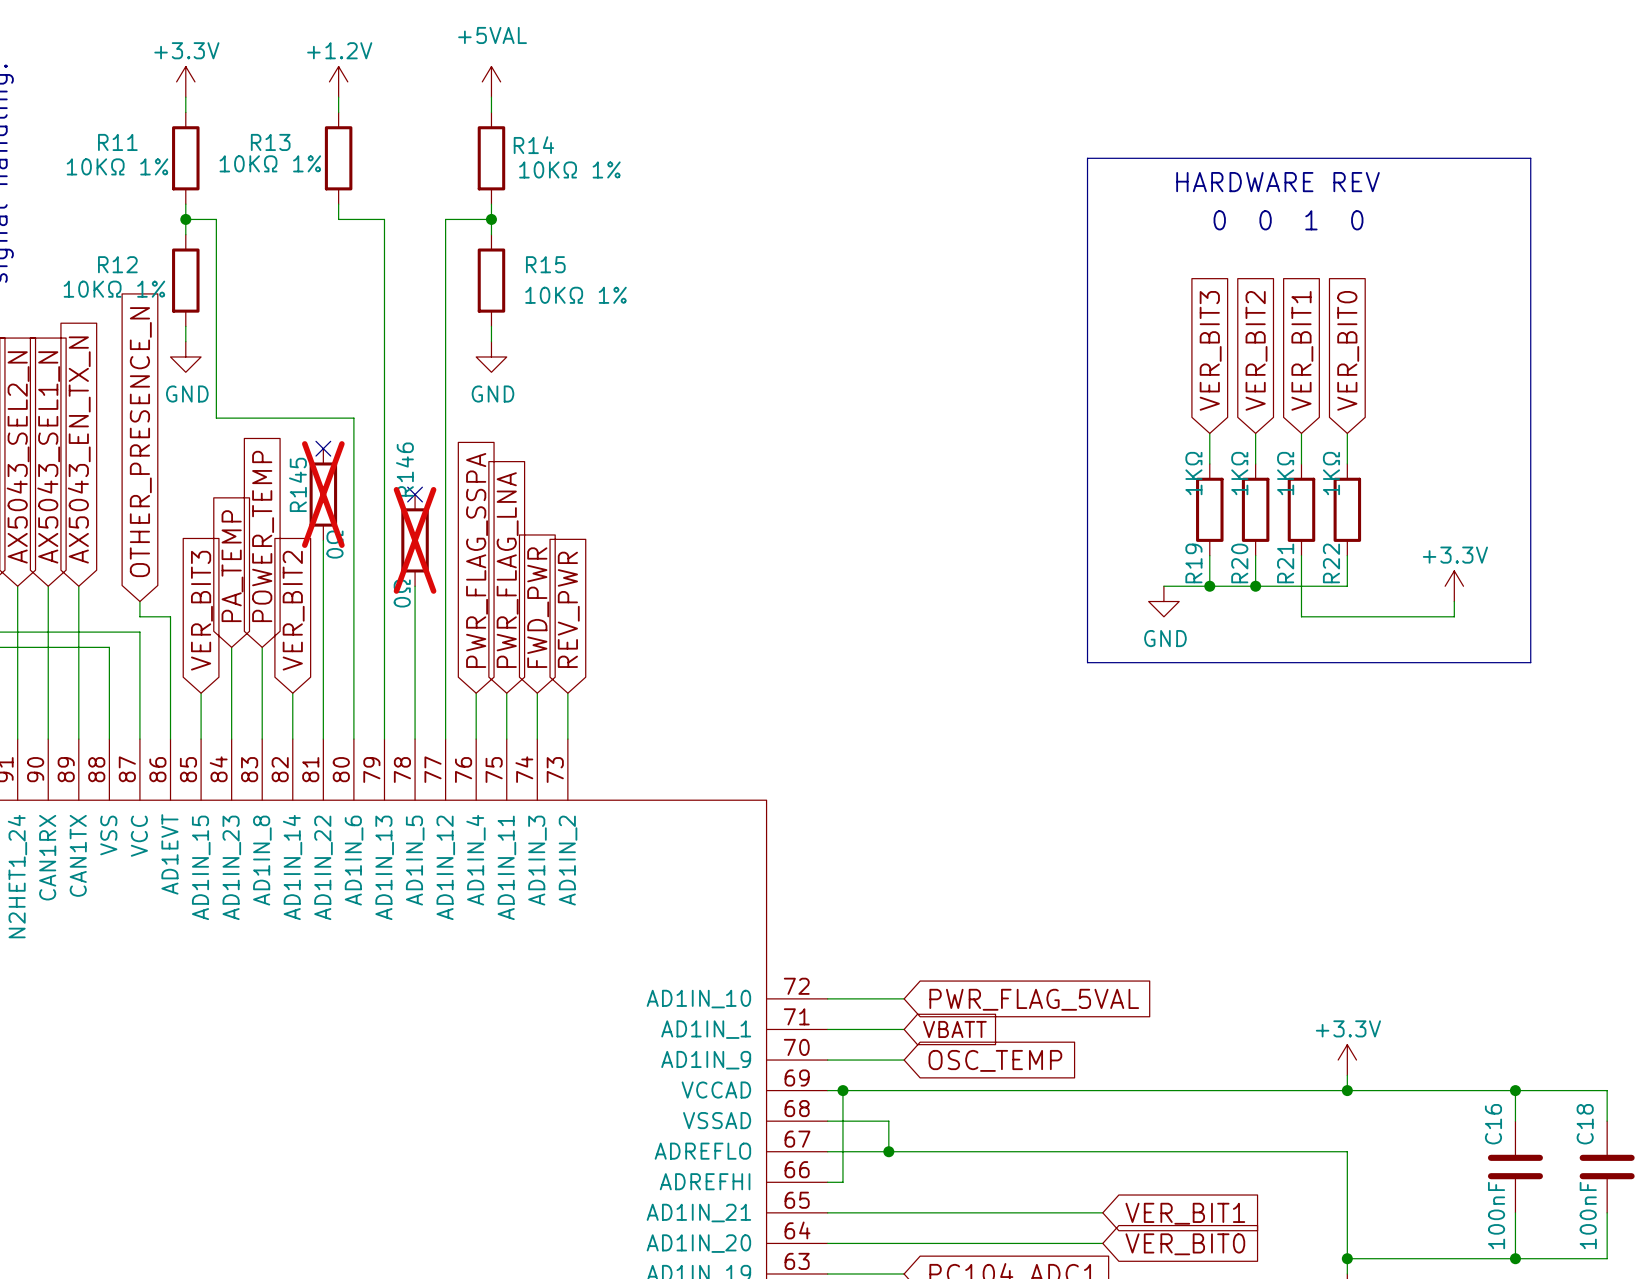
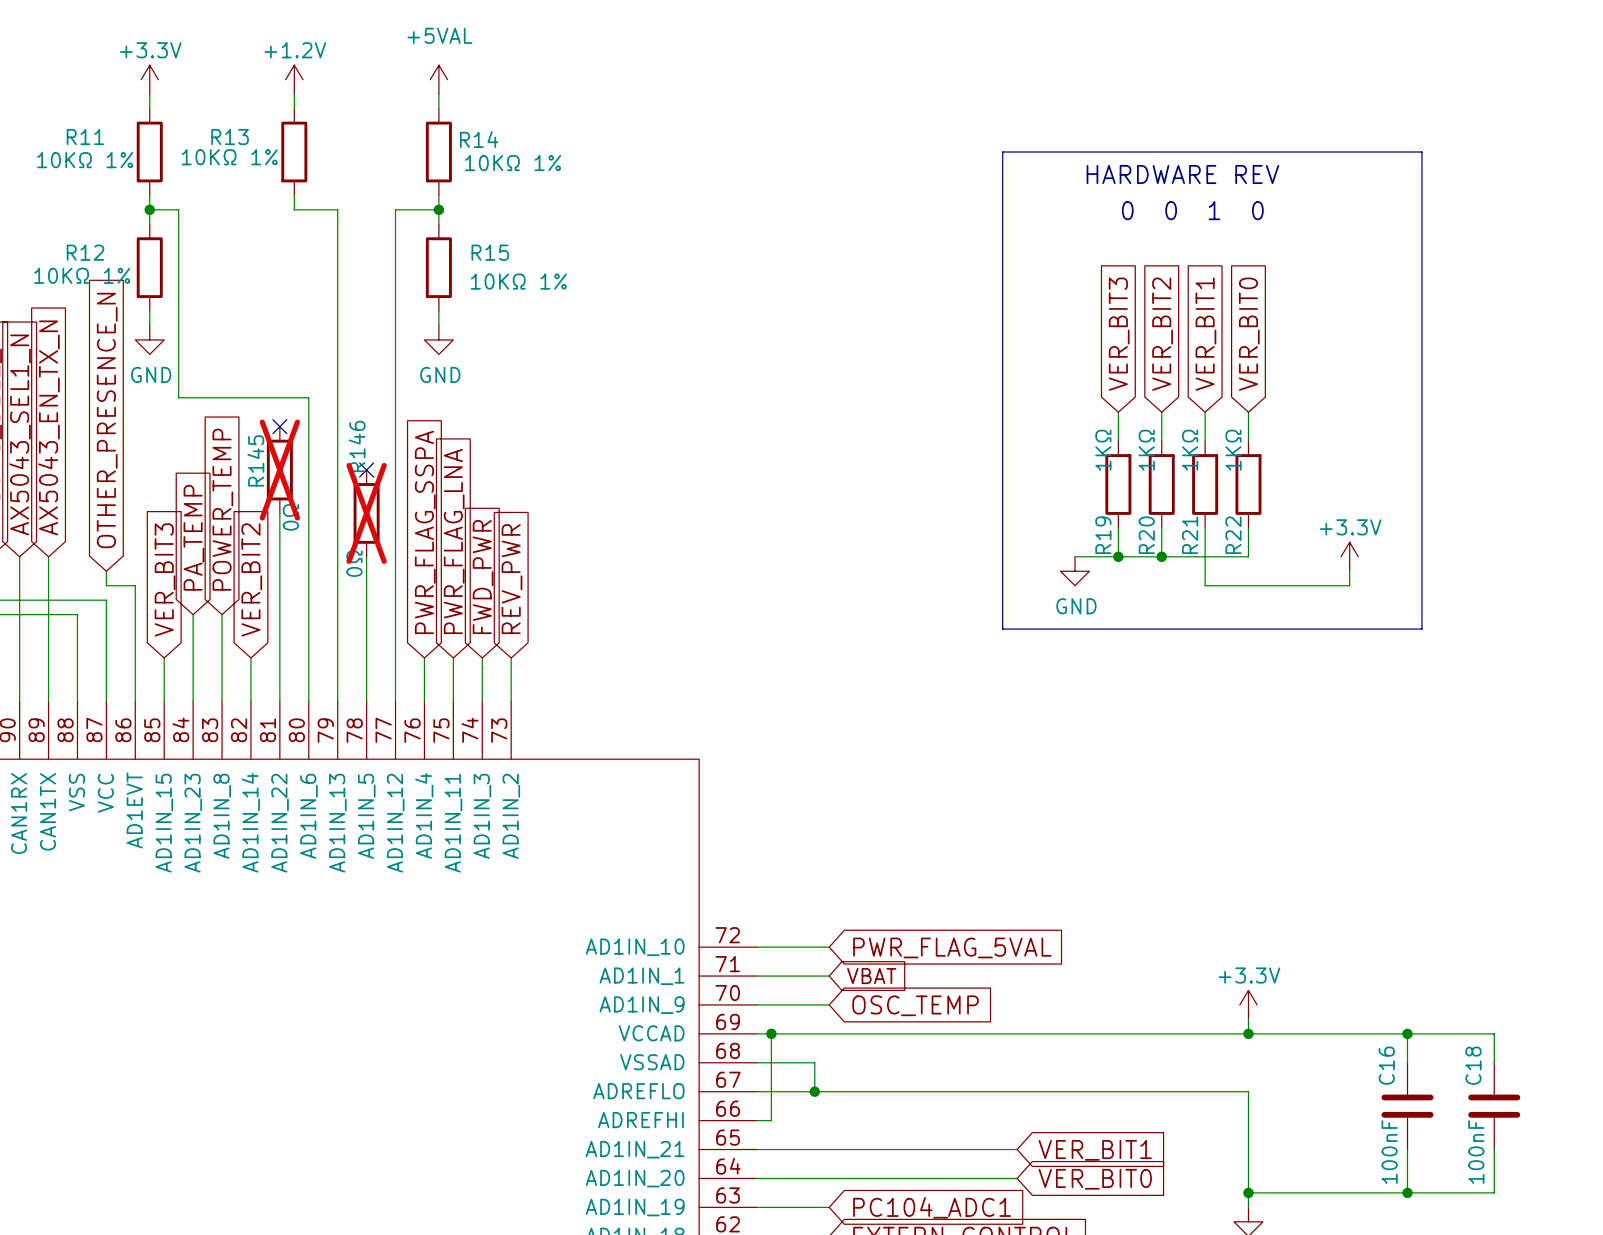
global label: VBATT (954, 1029) -> VBAT (871, 976)

